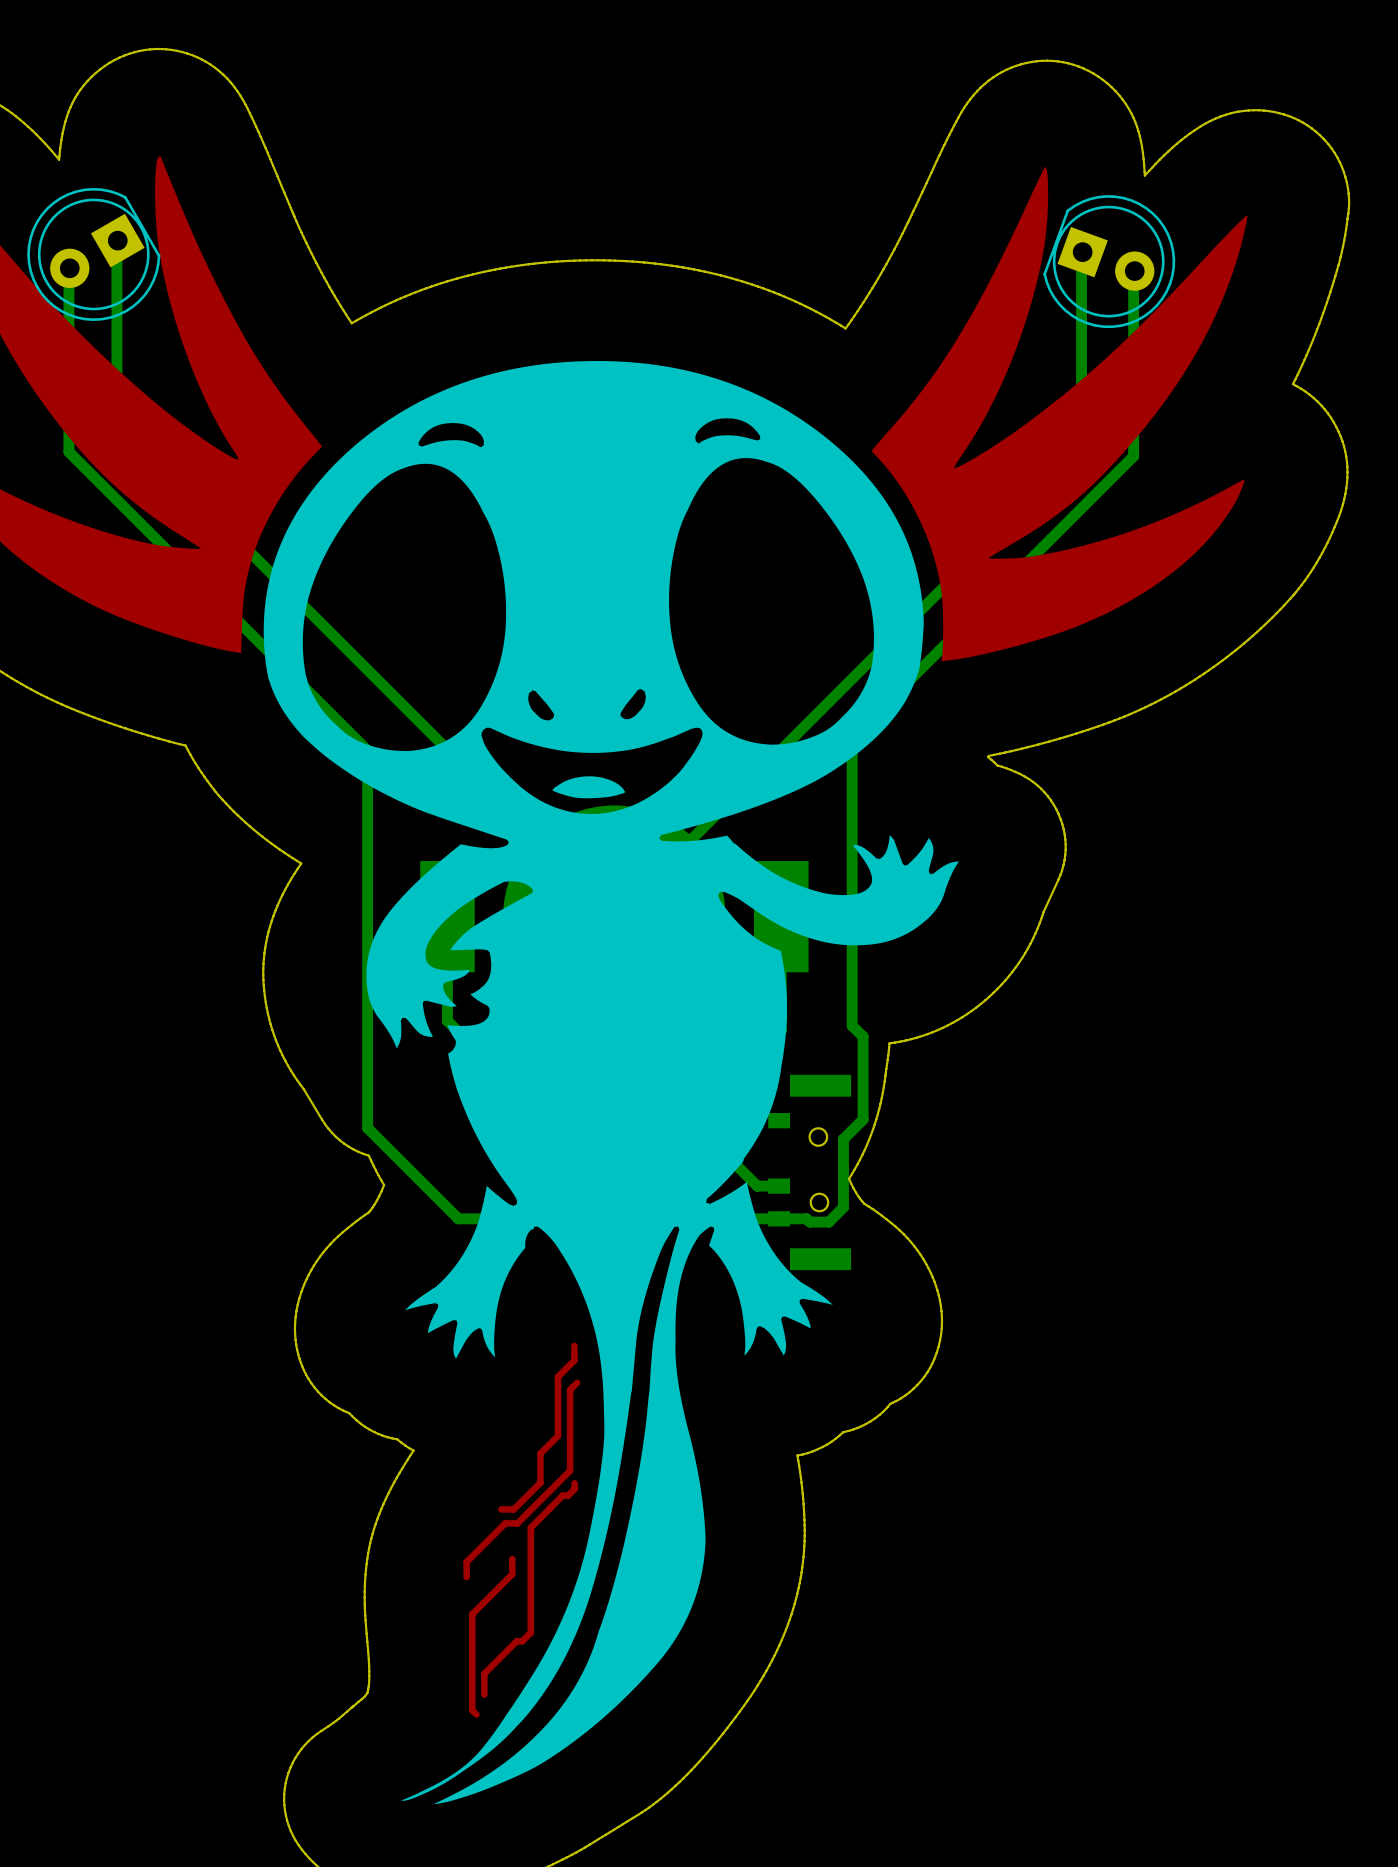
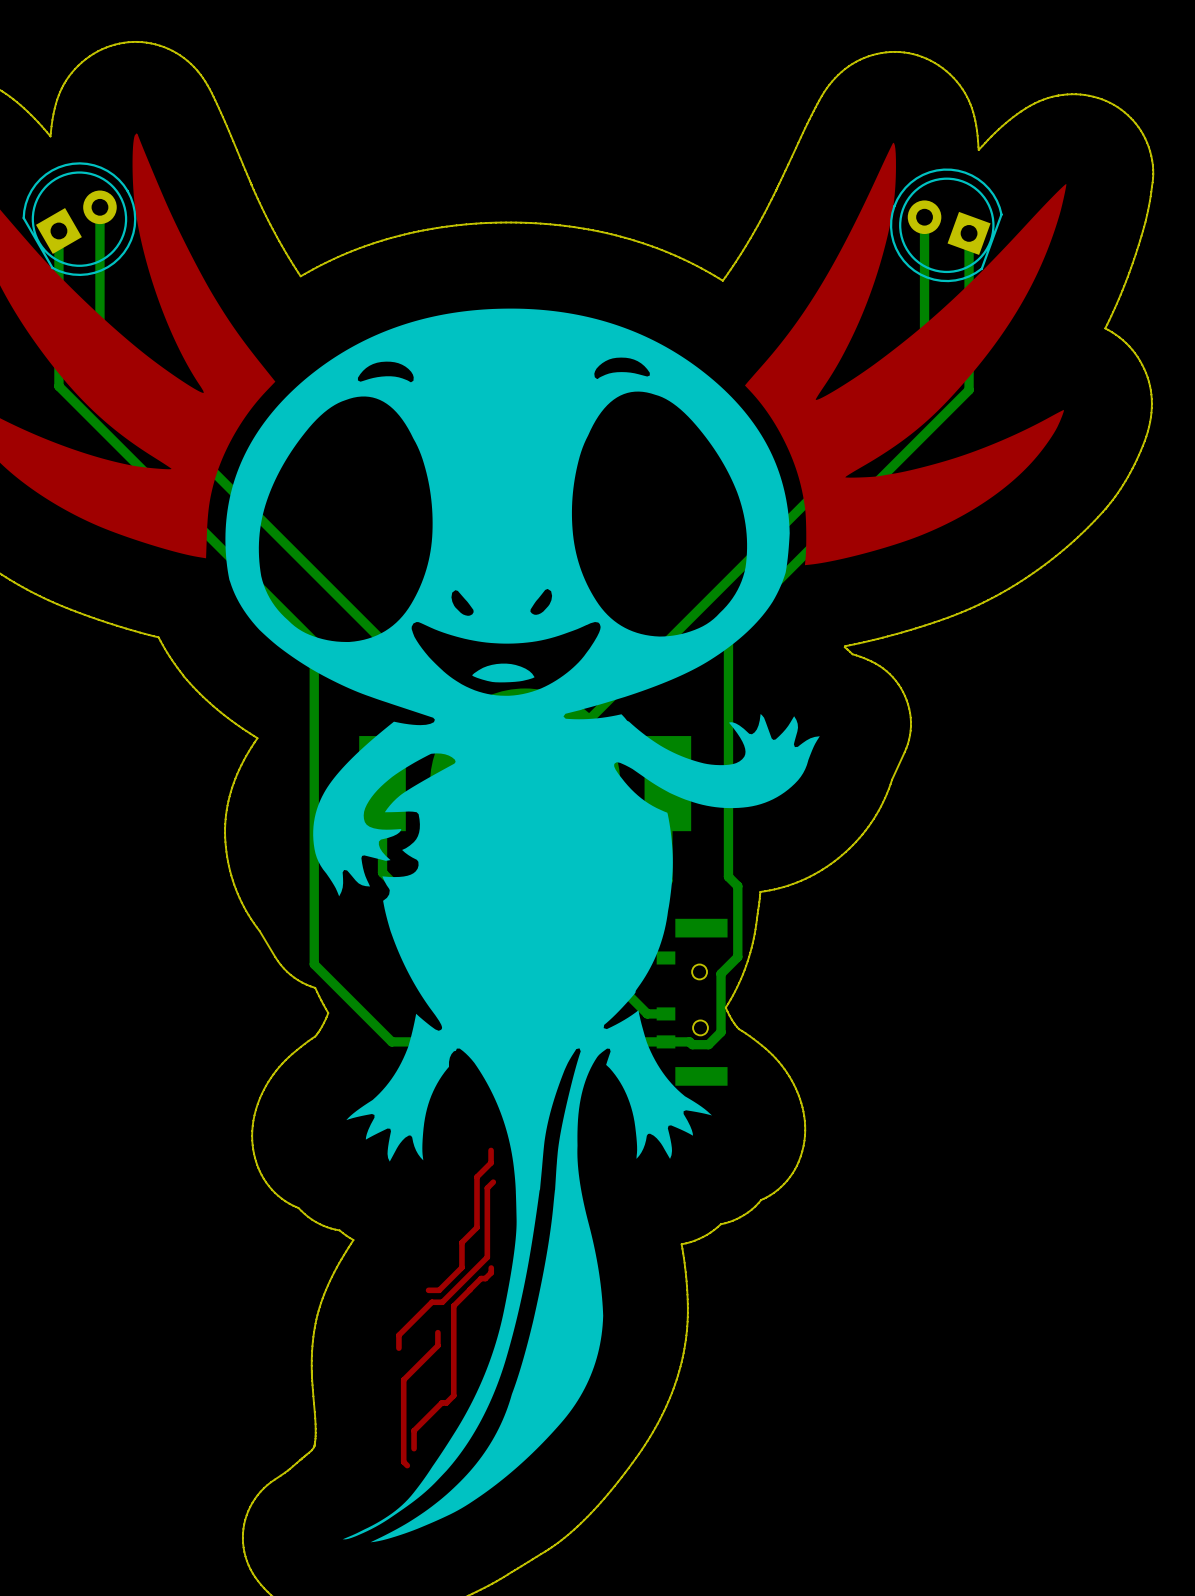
part footprint: [1043, 195, 1176, 329] -> [889, 168, 1003, 283]
part rotation: 0° (93, 254) -> 180° (79, 219)

